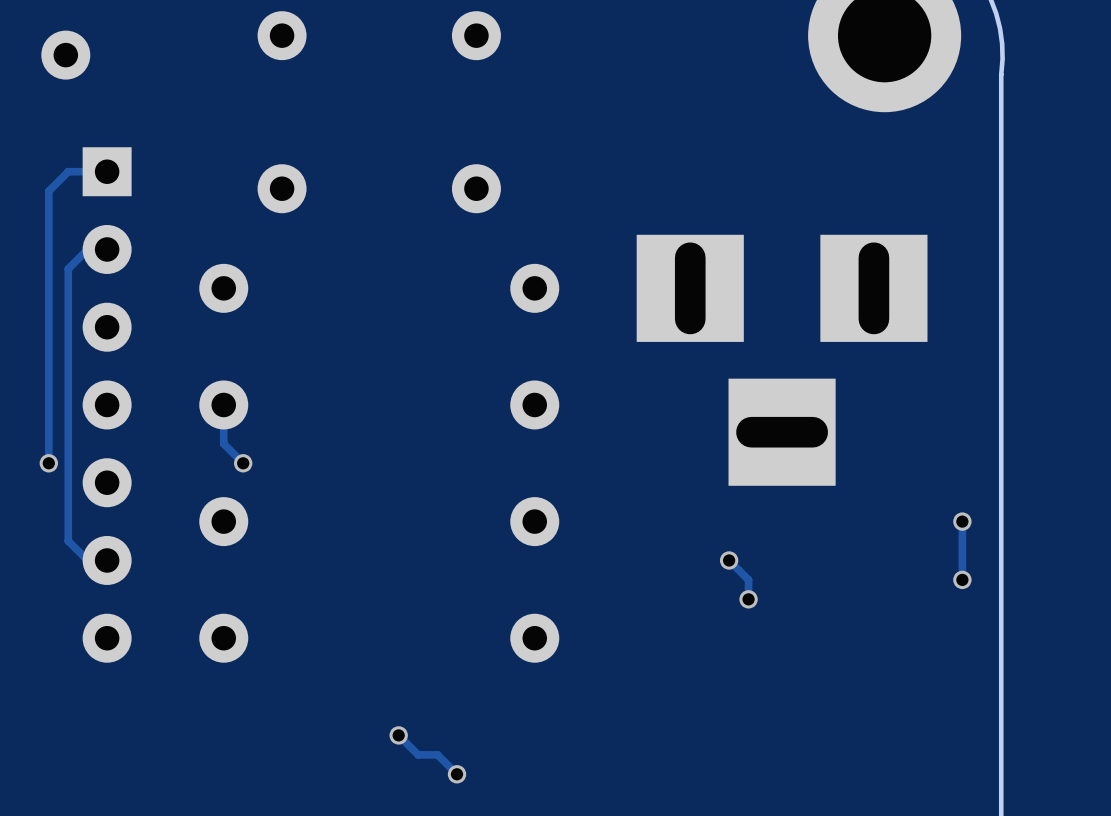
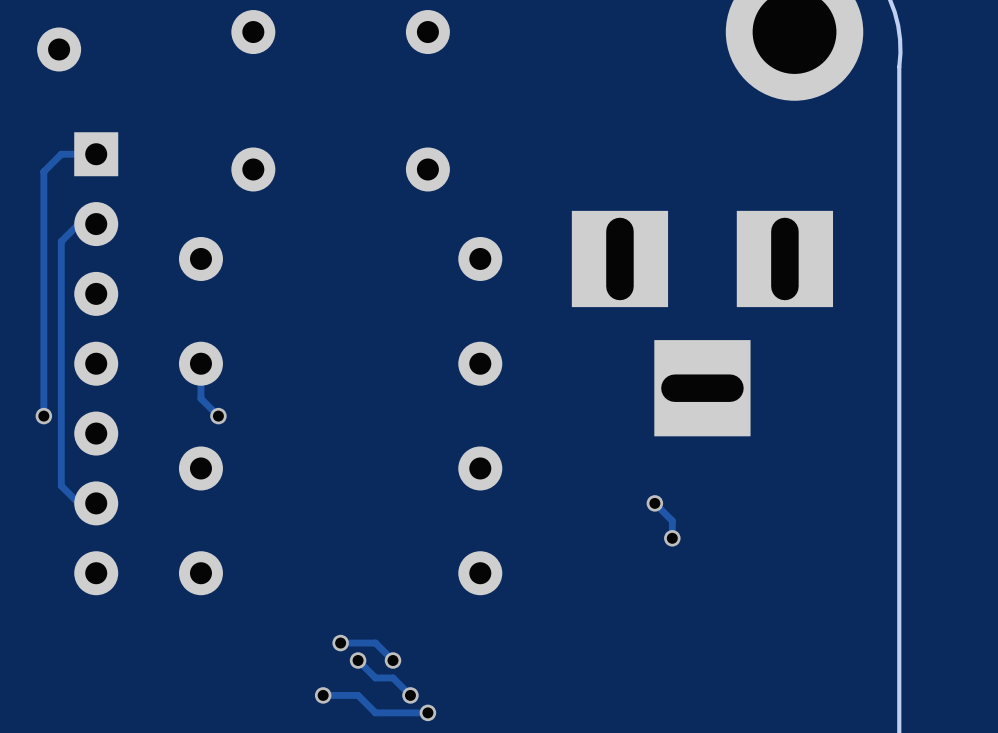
track: (962, 521) (962, 579) -> none
via: (962, 521) -> none
via: (962, 579) -> none
track: none -> (340, 643) (375, 643) (393, 660)
via: none -> (340, 643)
via: none -> (393, 660)
track: none -> (323, 695) (358, 695) (375, 712) (427, 712)
via: none -> (323, 695)
via: none -> (427, 712)

